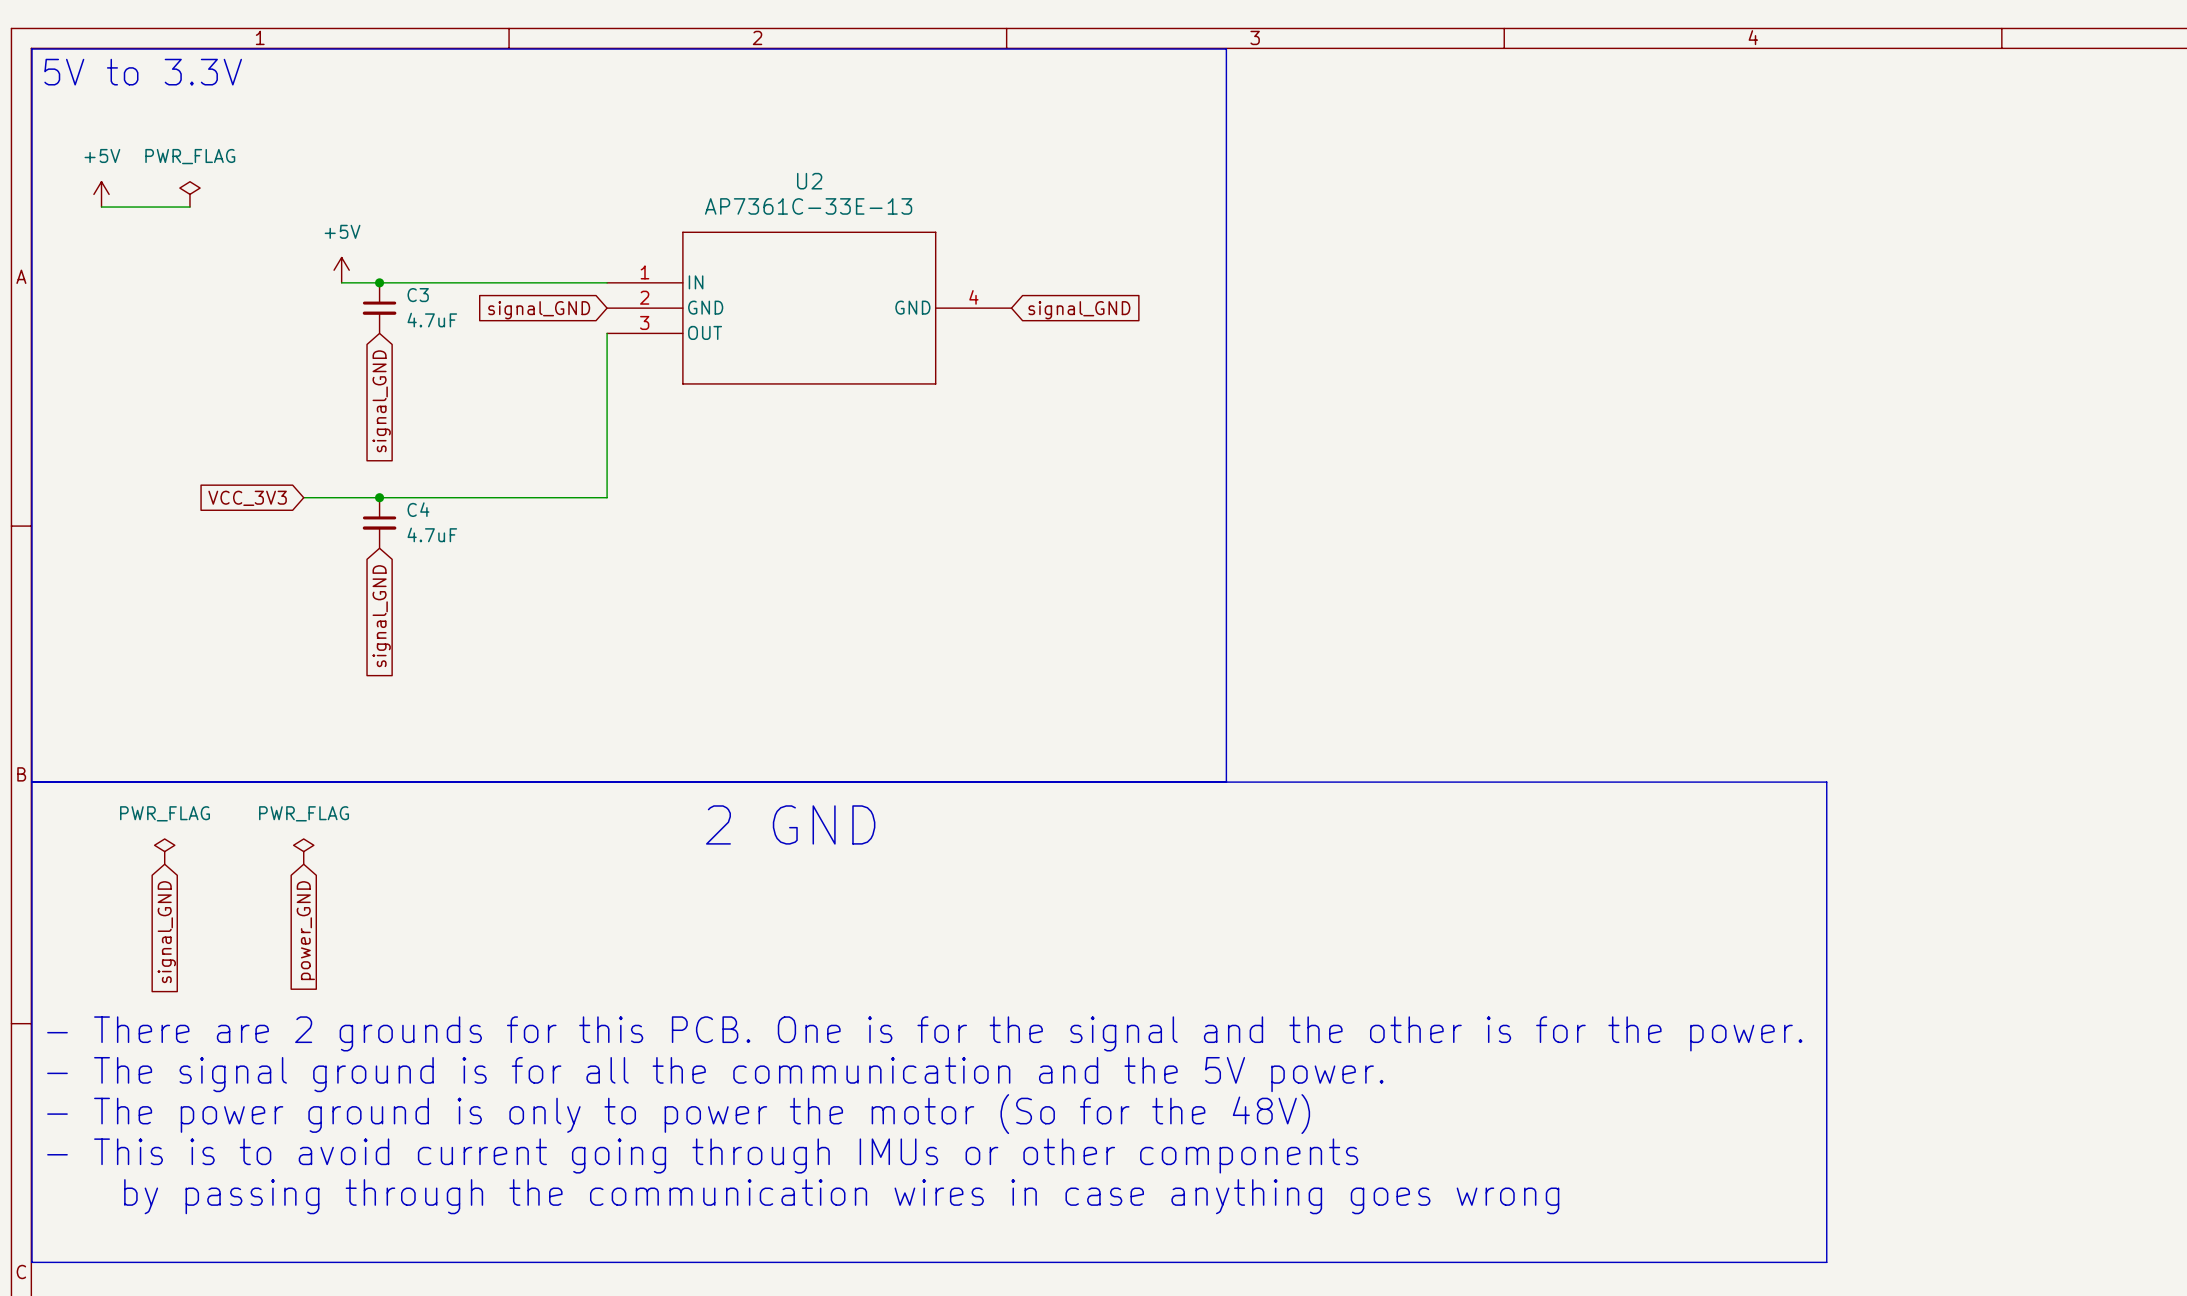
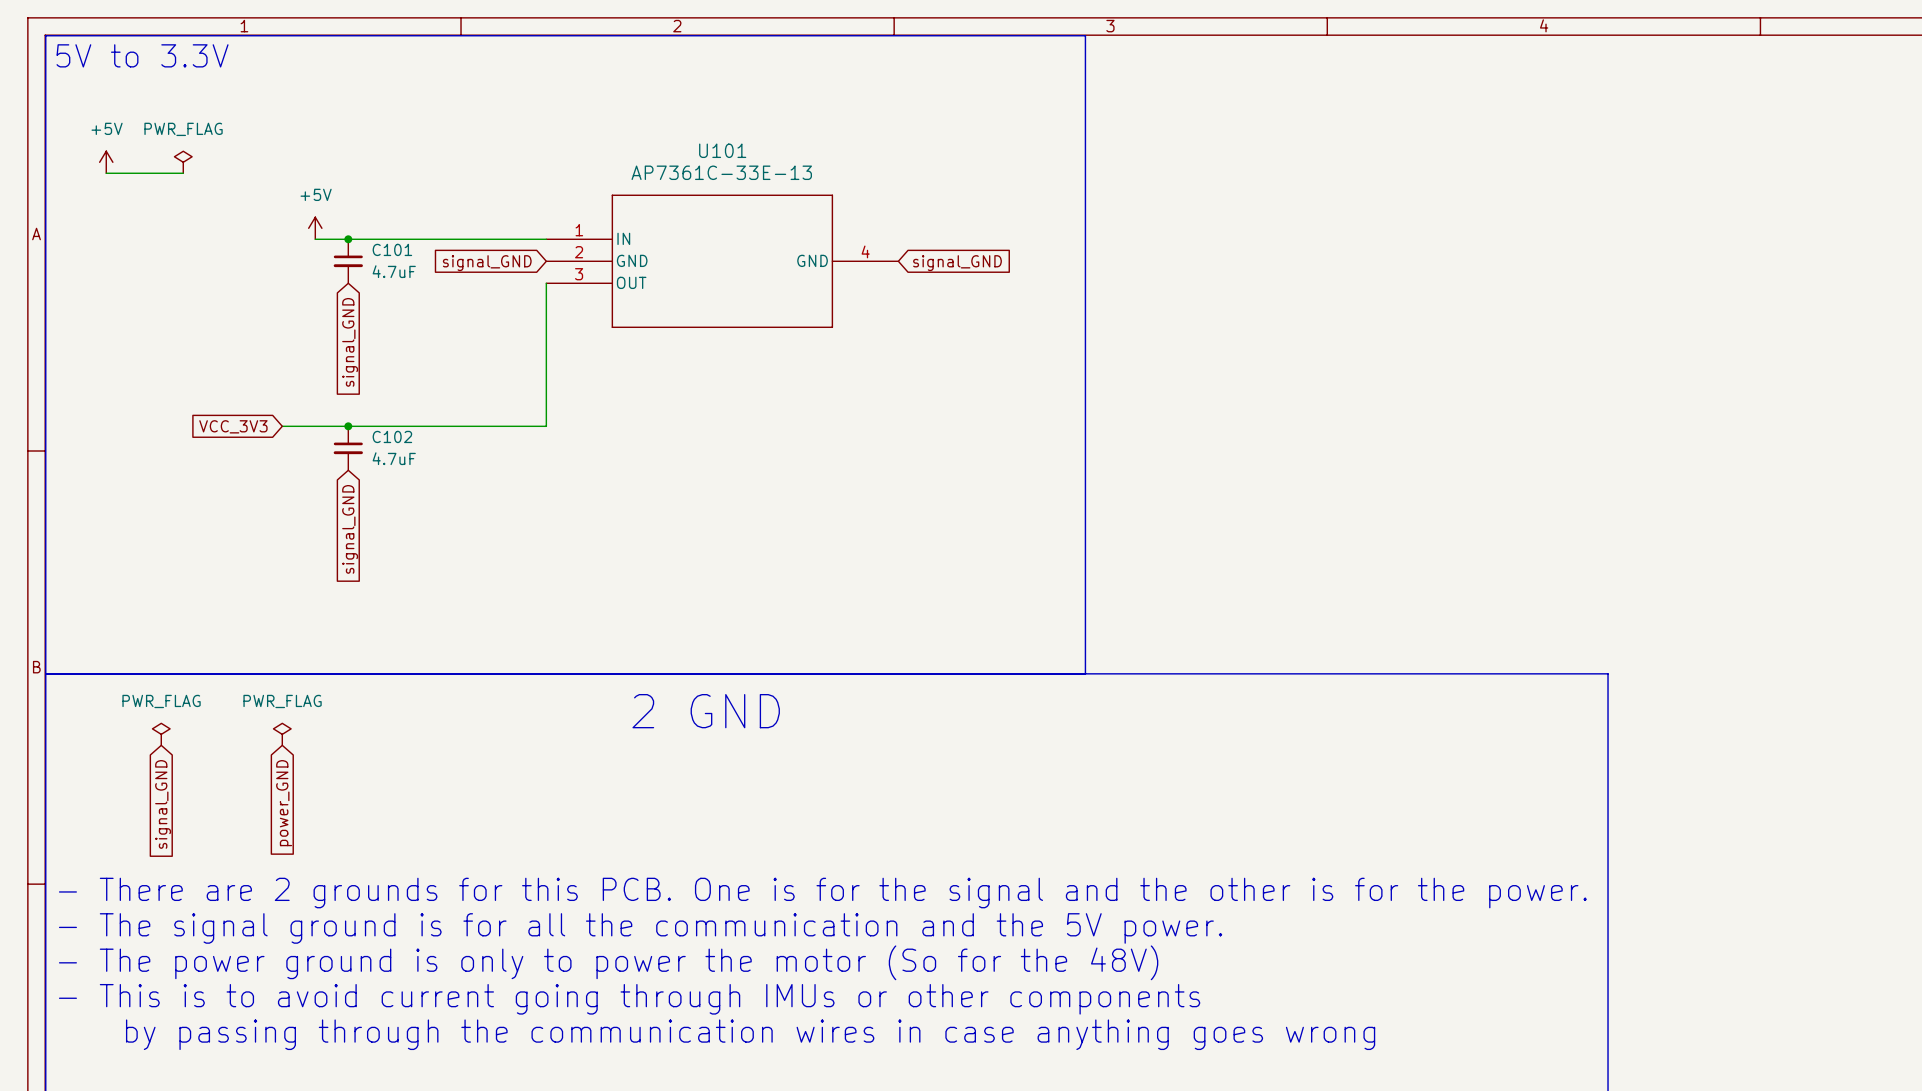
U2 name: U2 (809, 181) -> U101 (722, 150)
C3 name: C3 (418, 295) -> C101 (392, 249)
C4 name: C4 (418, 509) -> C102 (392, 436)

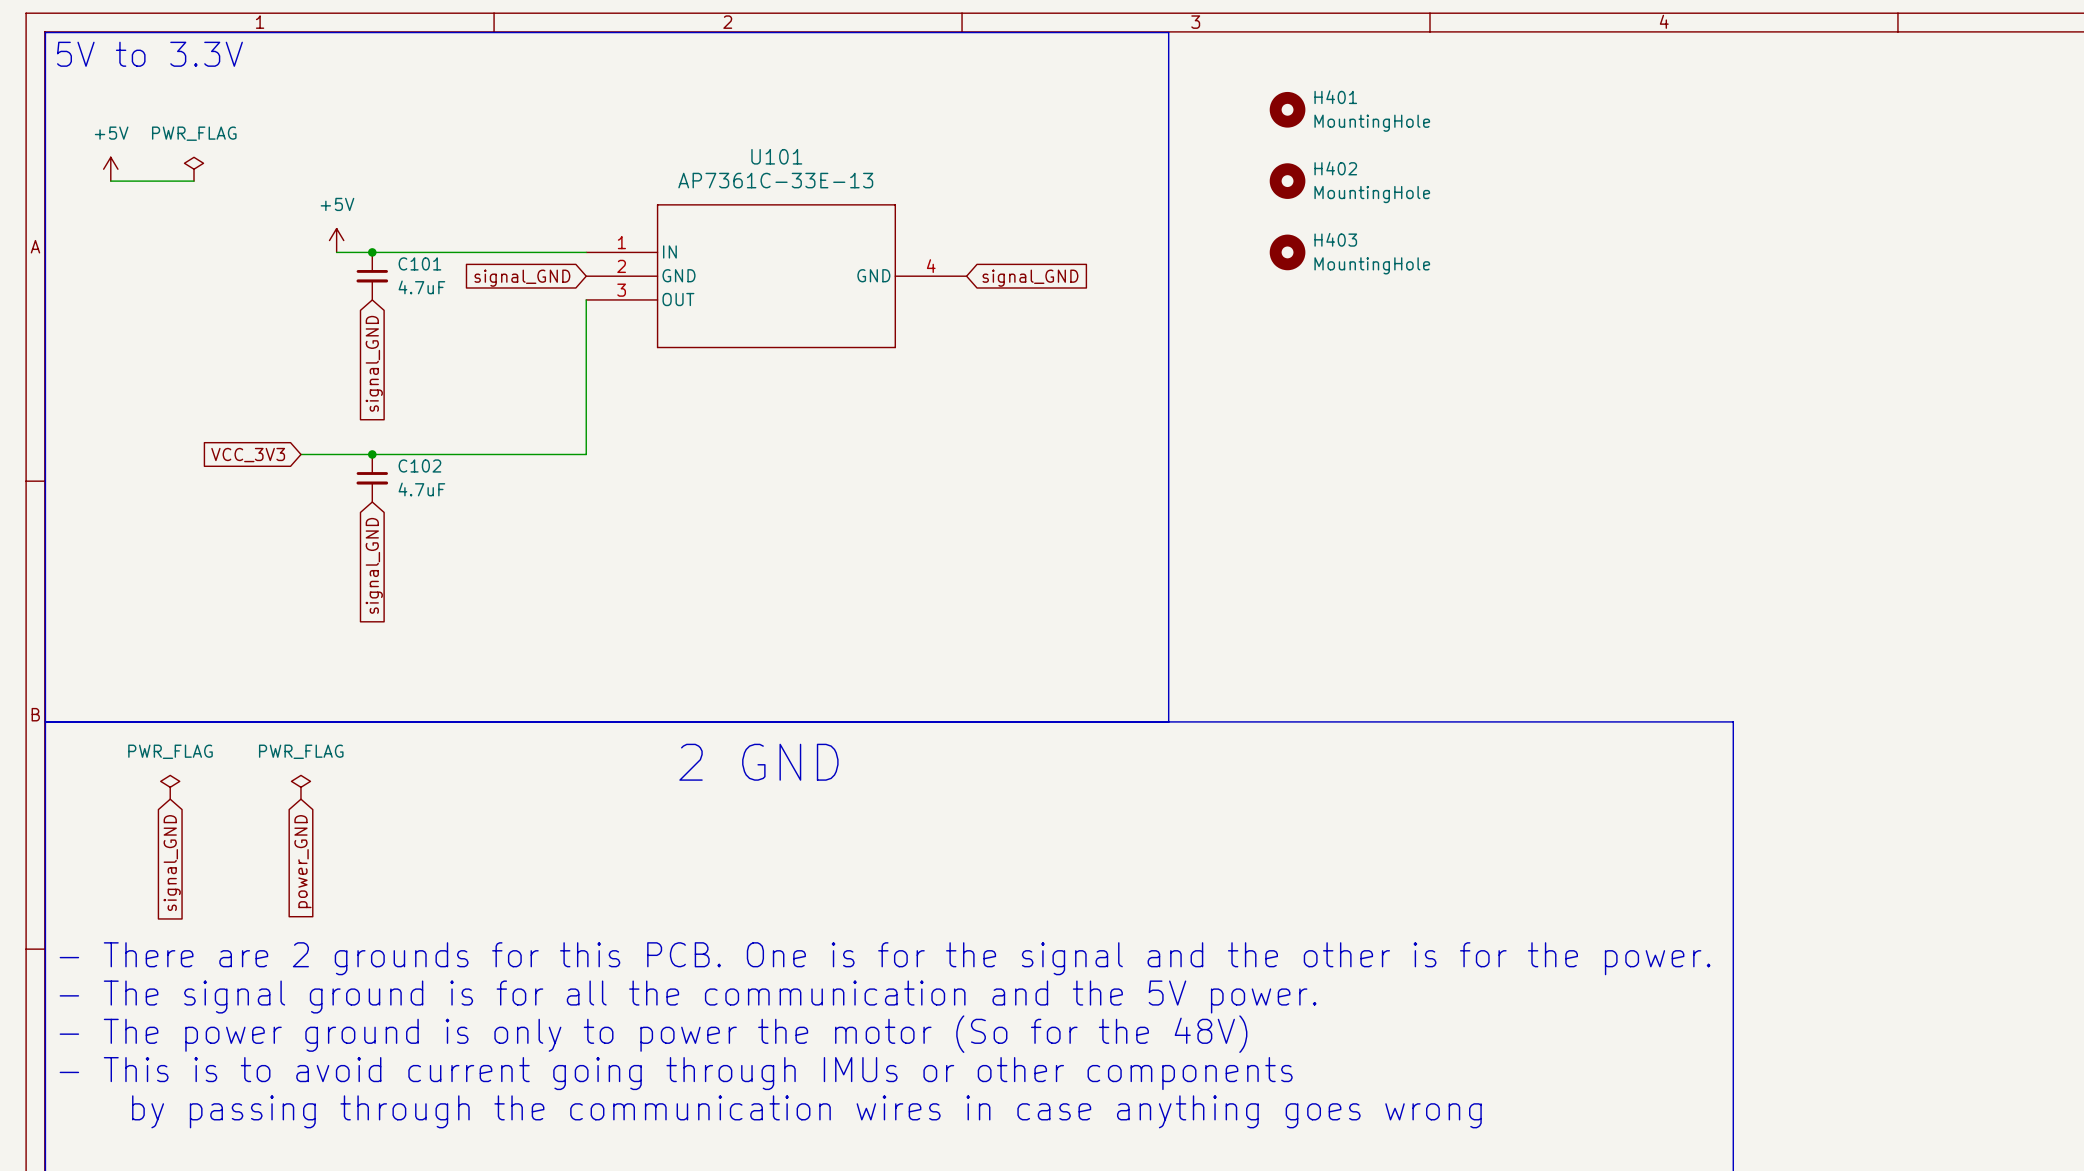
H401: none -> MountingHole (1287, 109)
H402: none -> MountingHole (1287, 181)
H403: none -> MountingHole (1287, 252)

